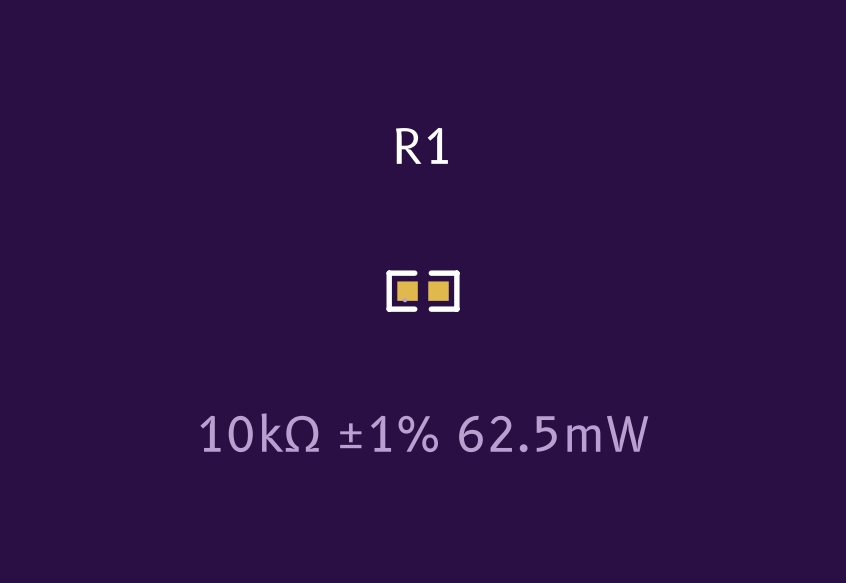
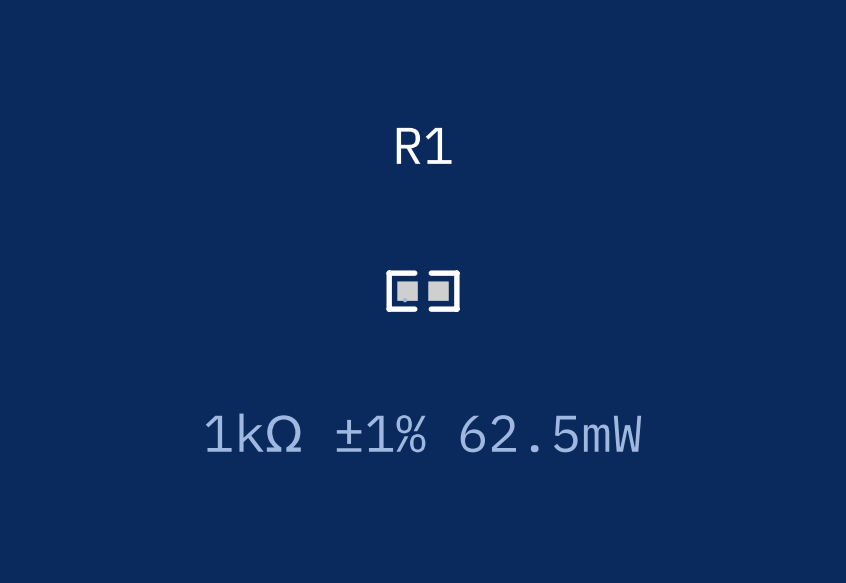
R1 value: 10kΩ ±1% 62.5mW (424, 432) -> 1kΩ ±1% 62.5mW (423, 432)

